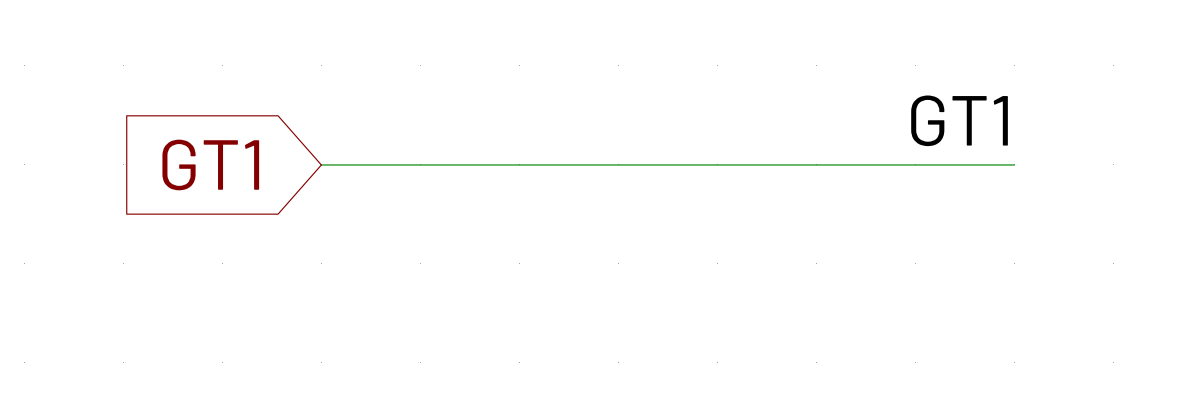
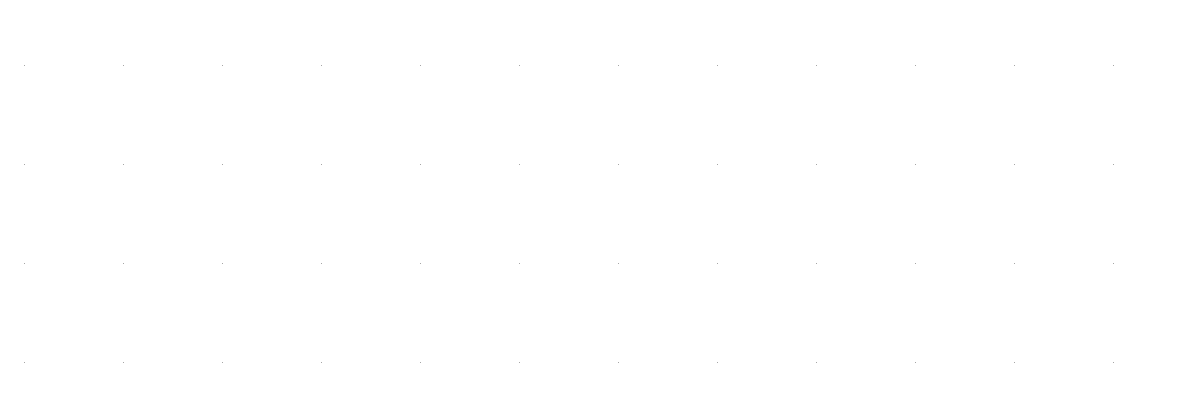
label: GT1 (959, 120) -> none
global label: GT1 (210, 164) -> none
wire: (321, 164) (1014, 164) -> none

